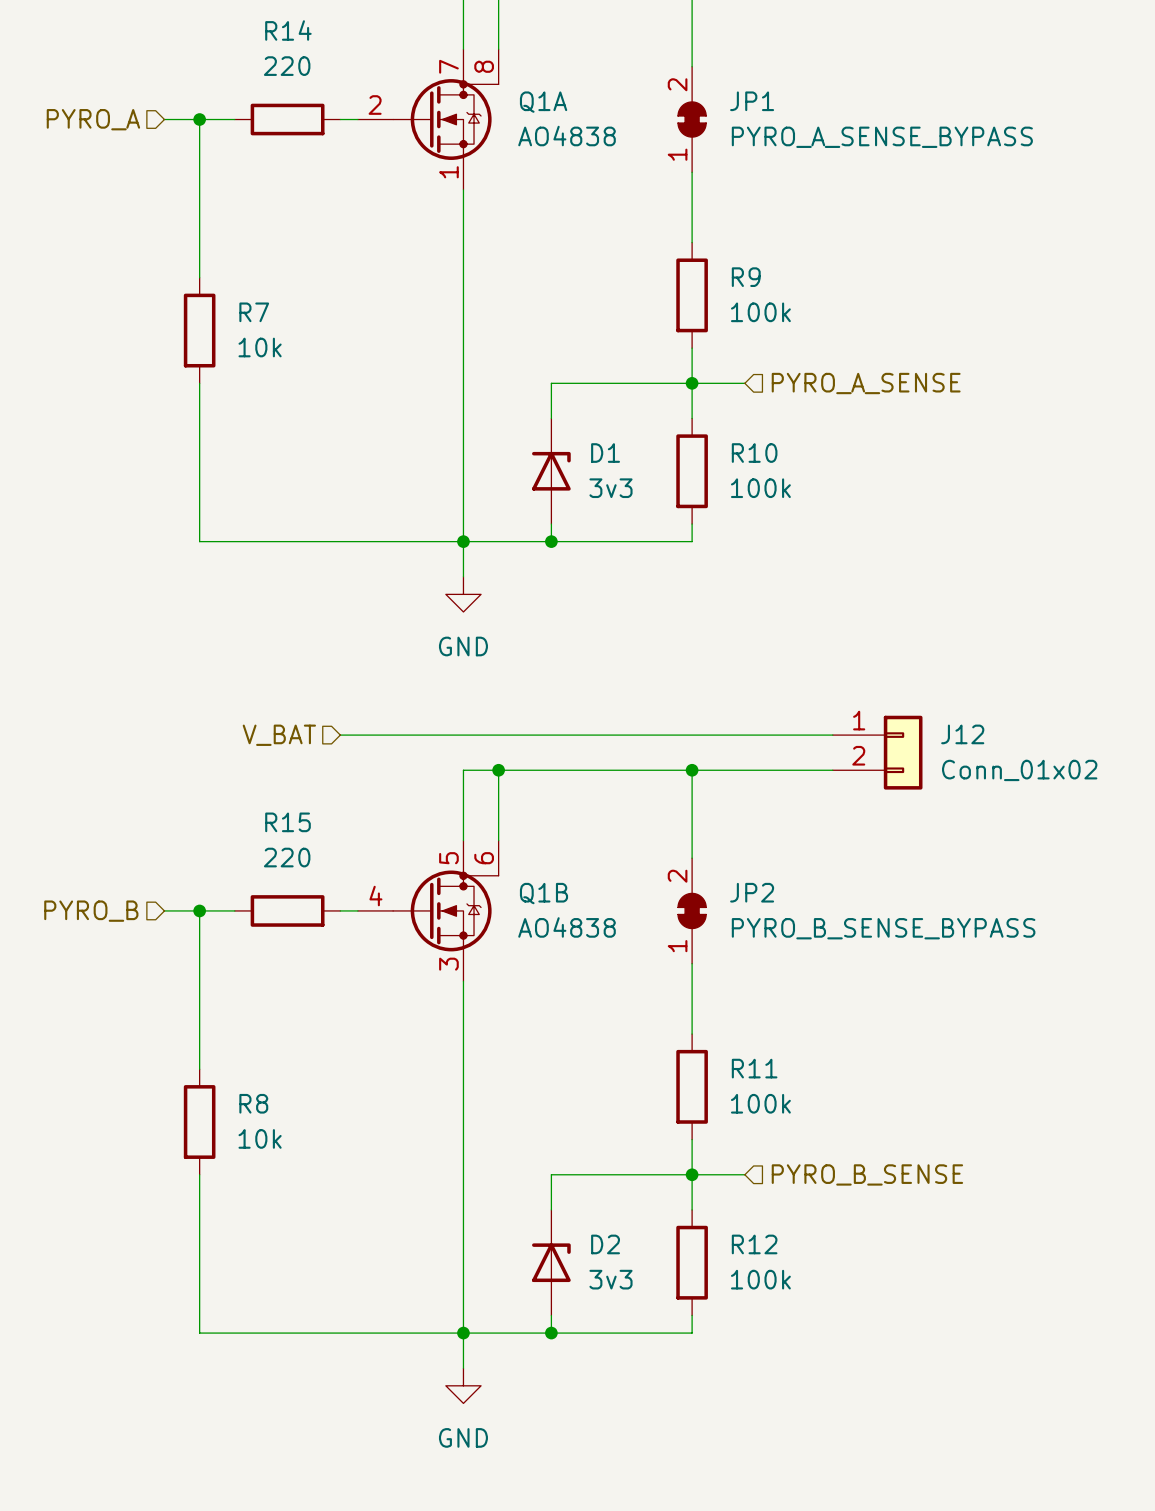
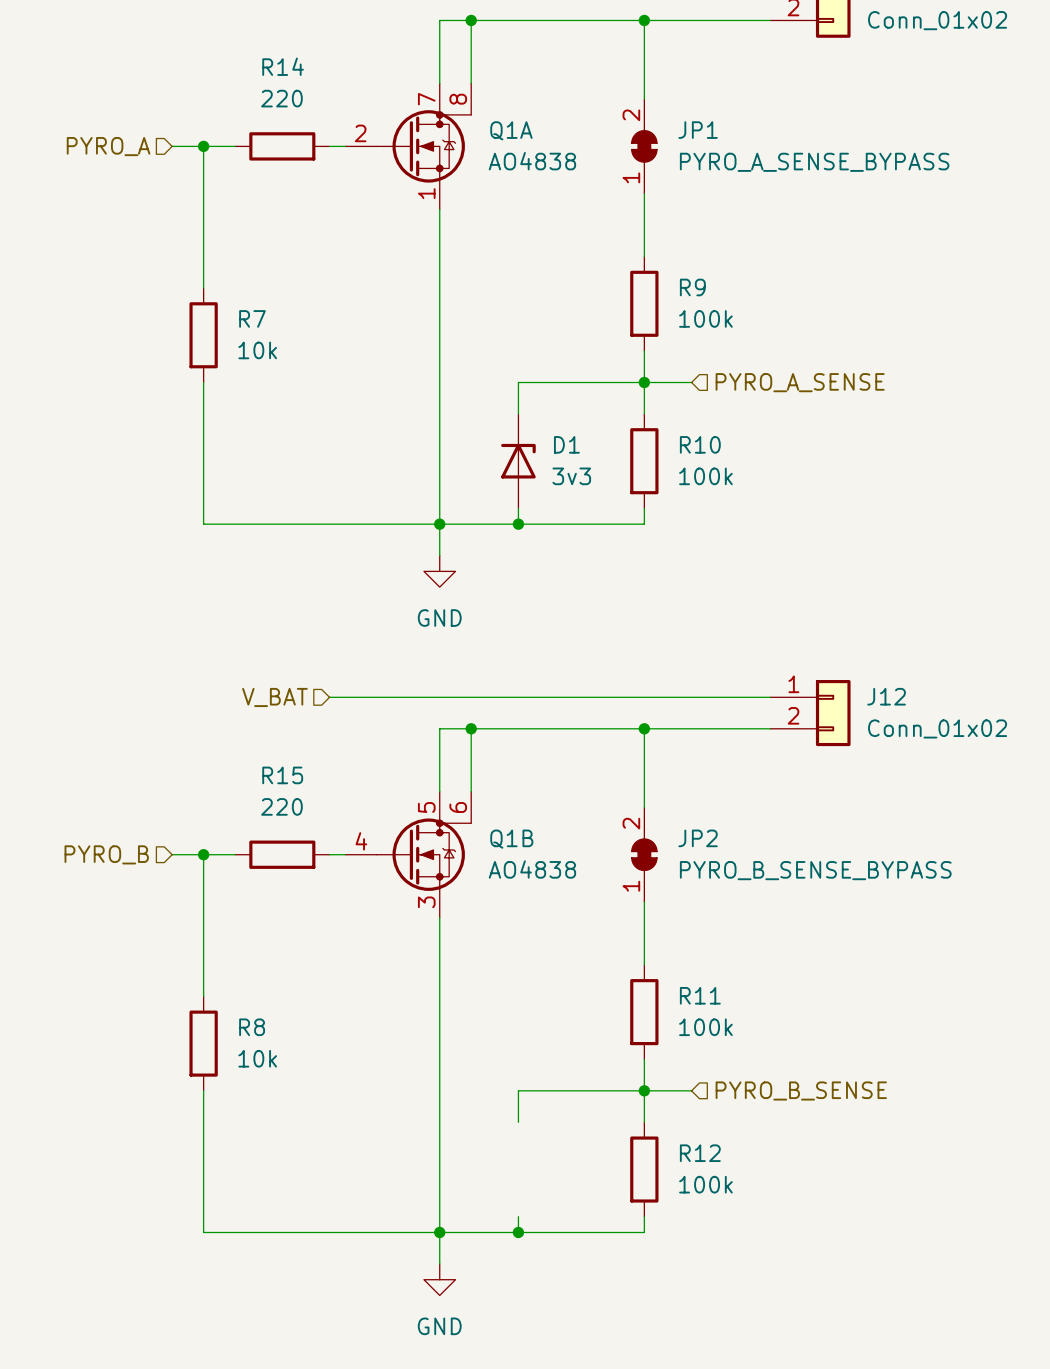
D2: 3v3 (551, 1262) -> none

